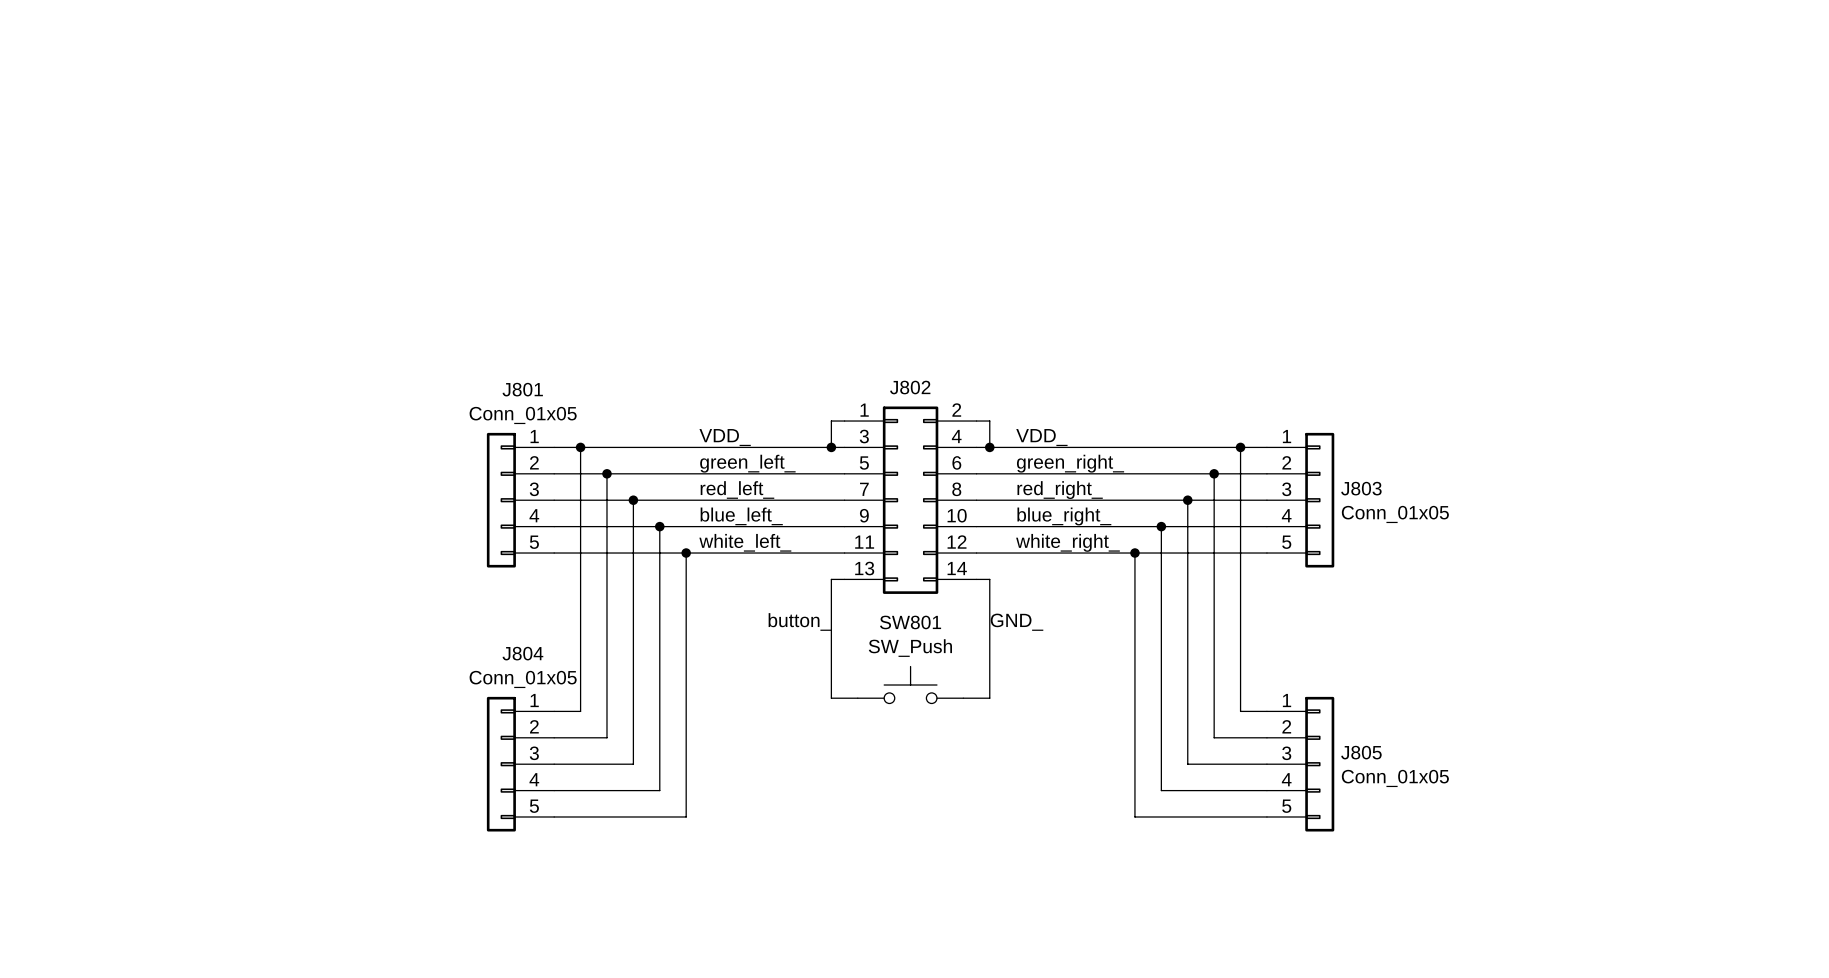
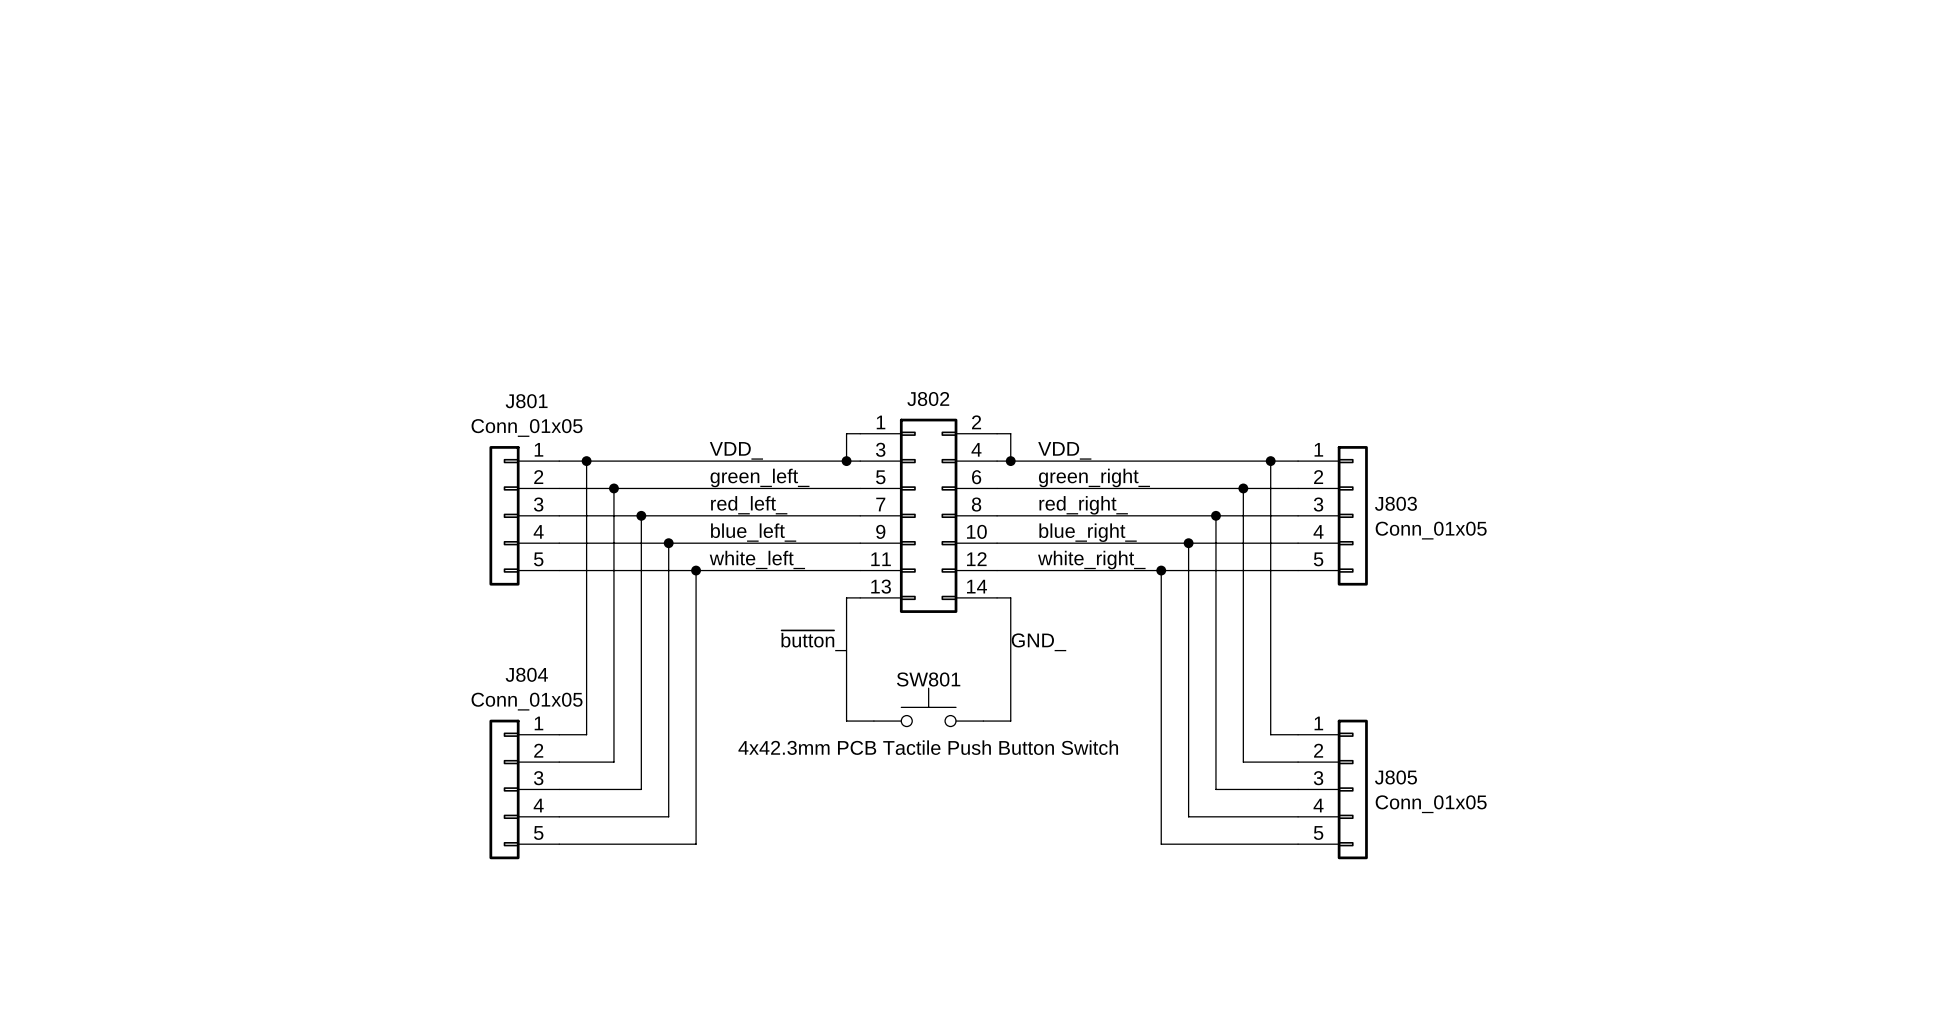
label: button_ (800, 621) -> ~{button}_ (814, 640)
SW801 name position: SW801 (910, 622) -> SW801 (928, 679)
SW801 value: SW_Push (910, 648) -> 4x42.3mm PCB Tactile Push Button Switch (928, 747)

